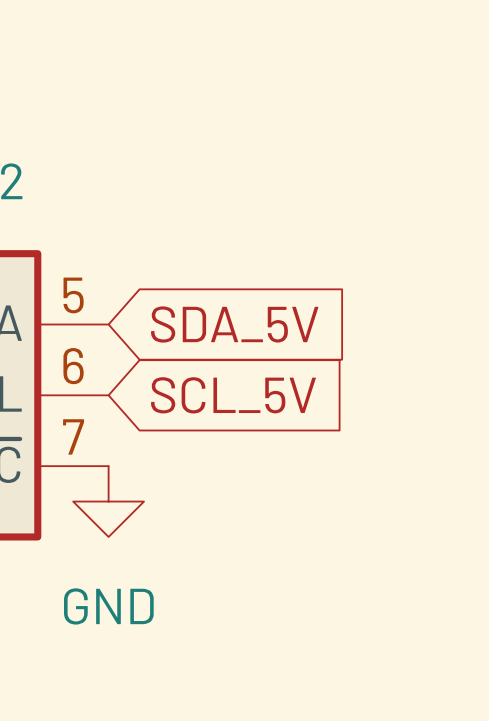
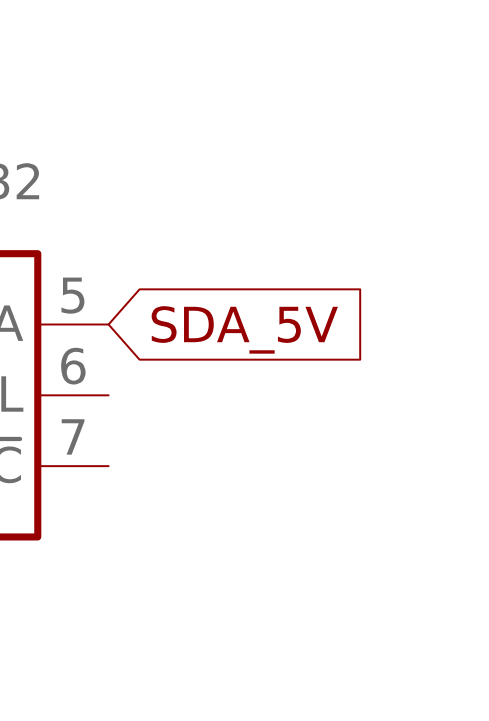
global label: SCL_5V (233, 395) -> none
power symbol: GND (108, 501) -> none

